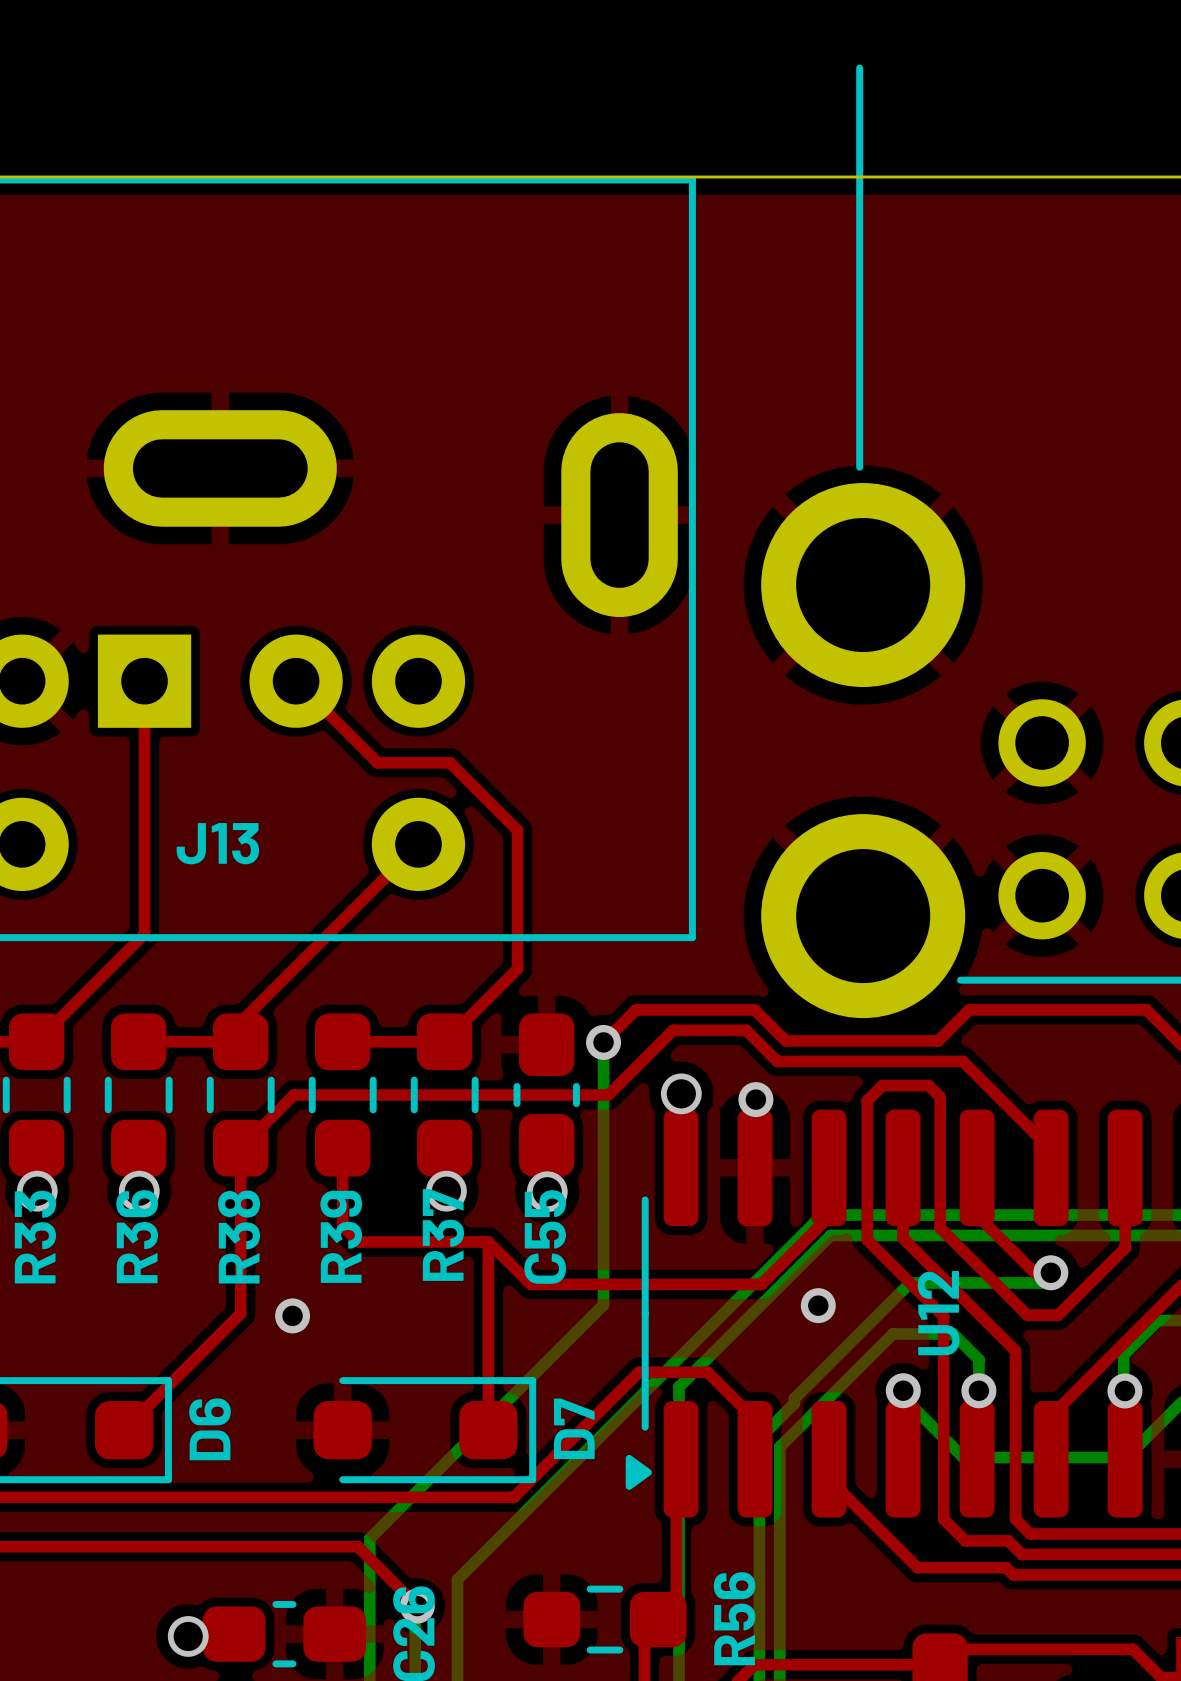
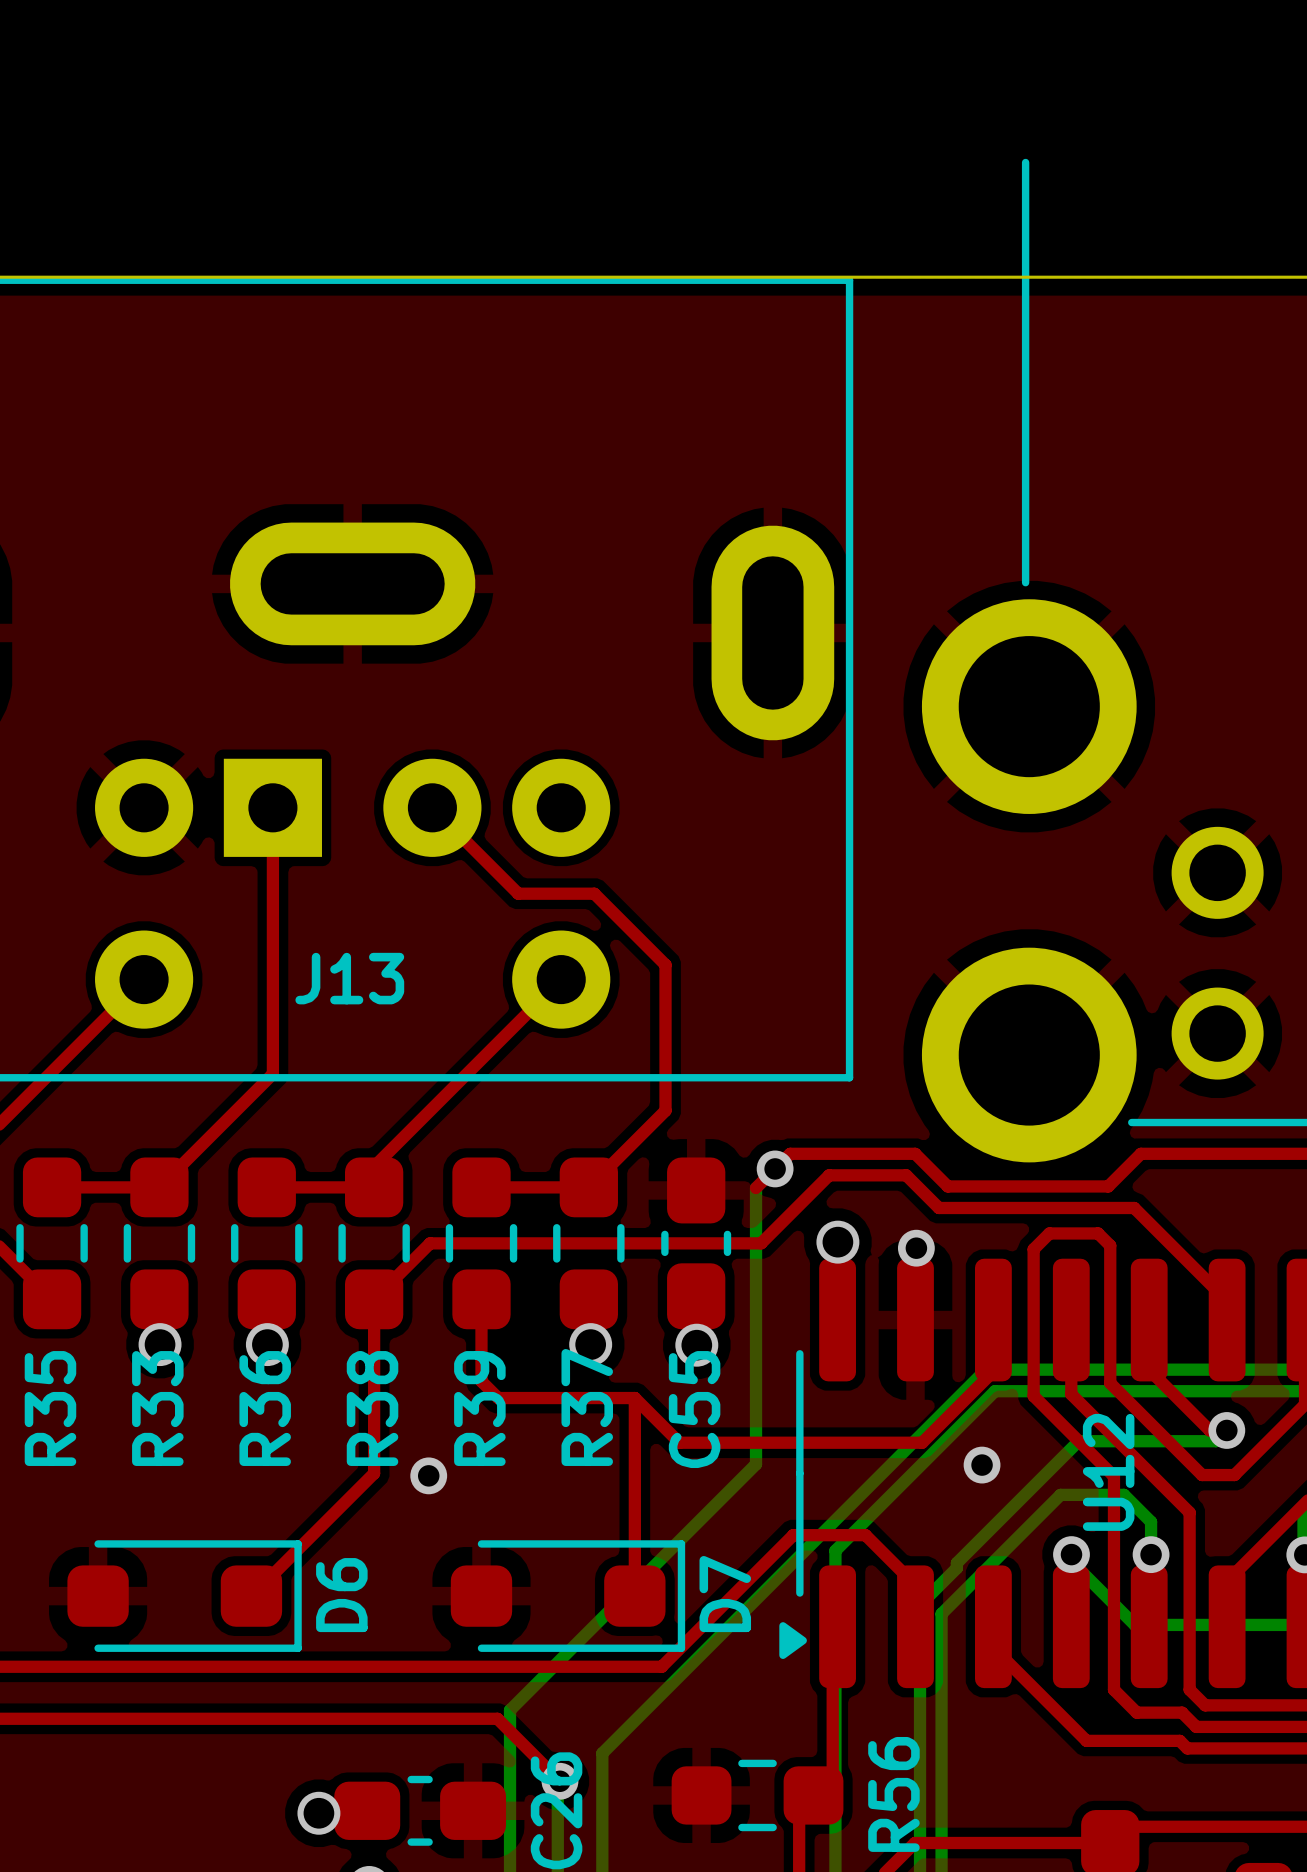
via position: (603, 1042) -> (775, 1168)

